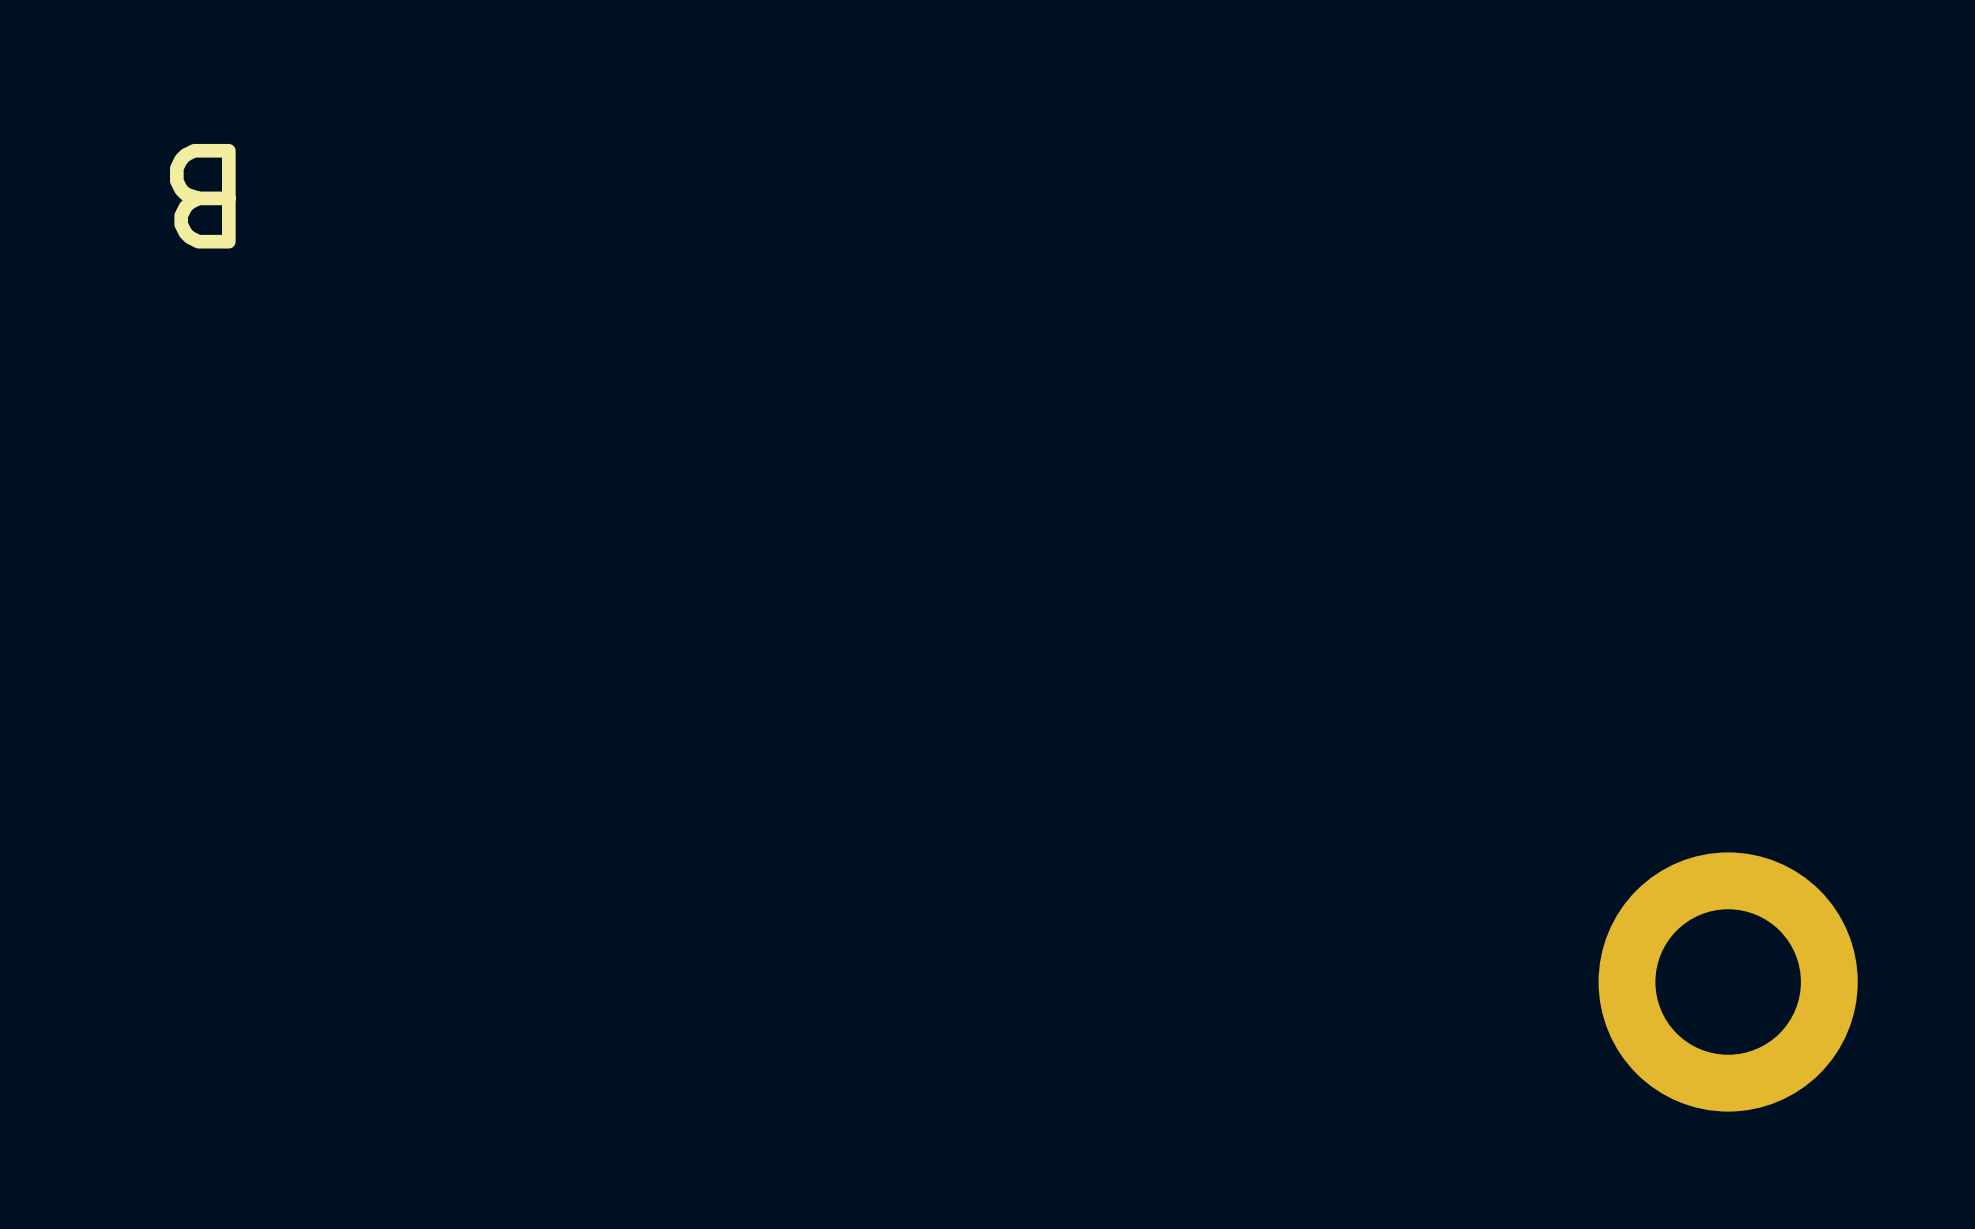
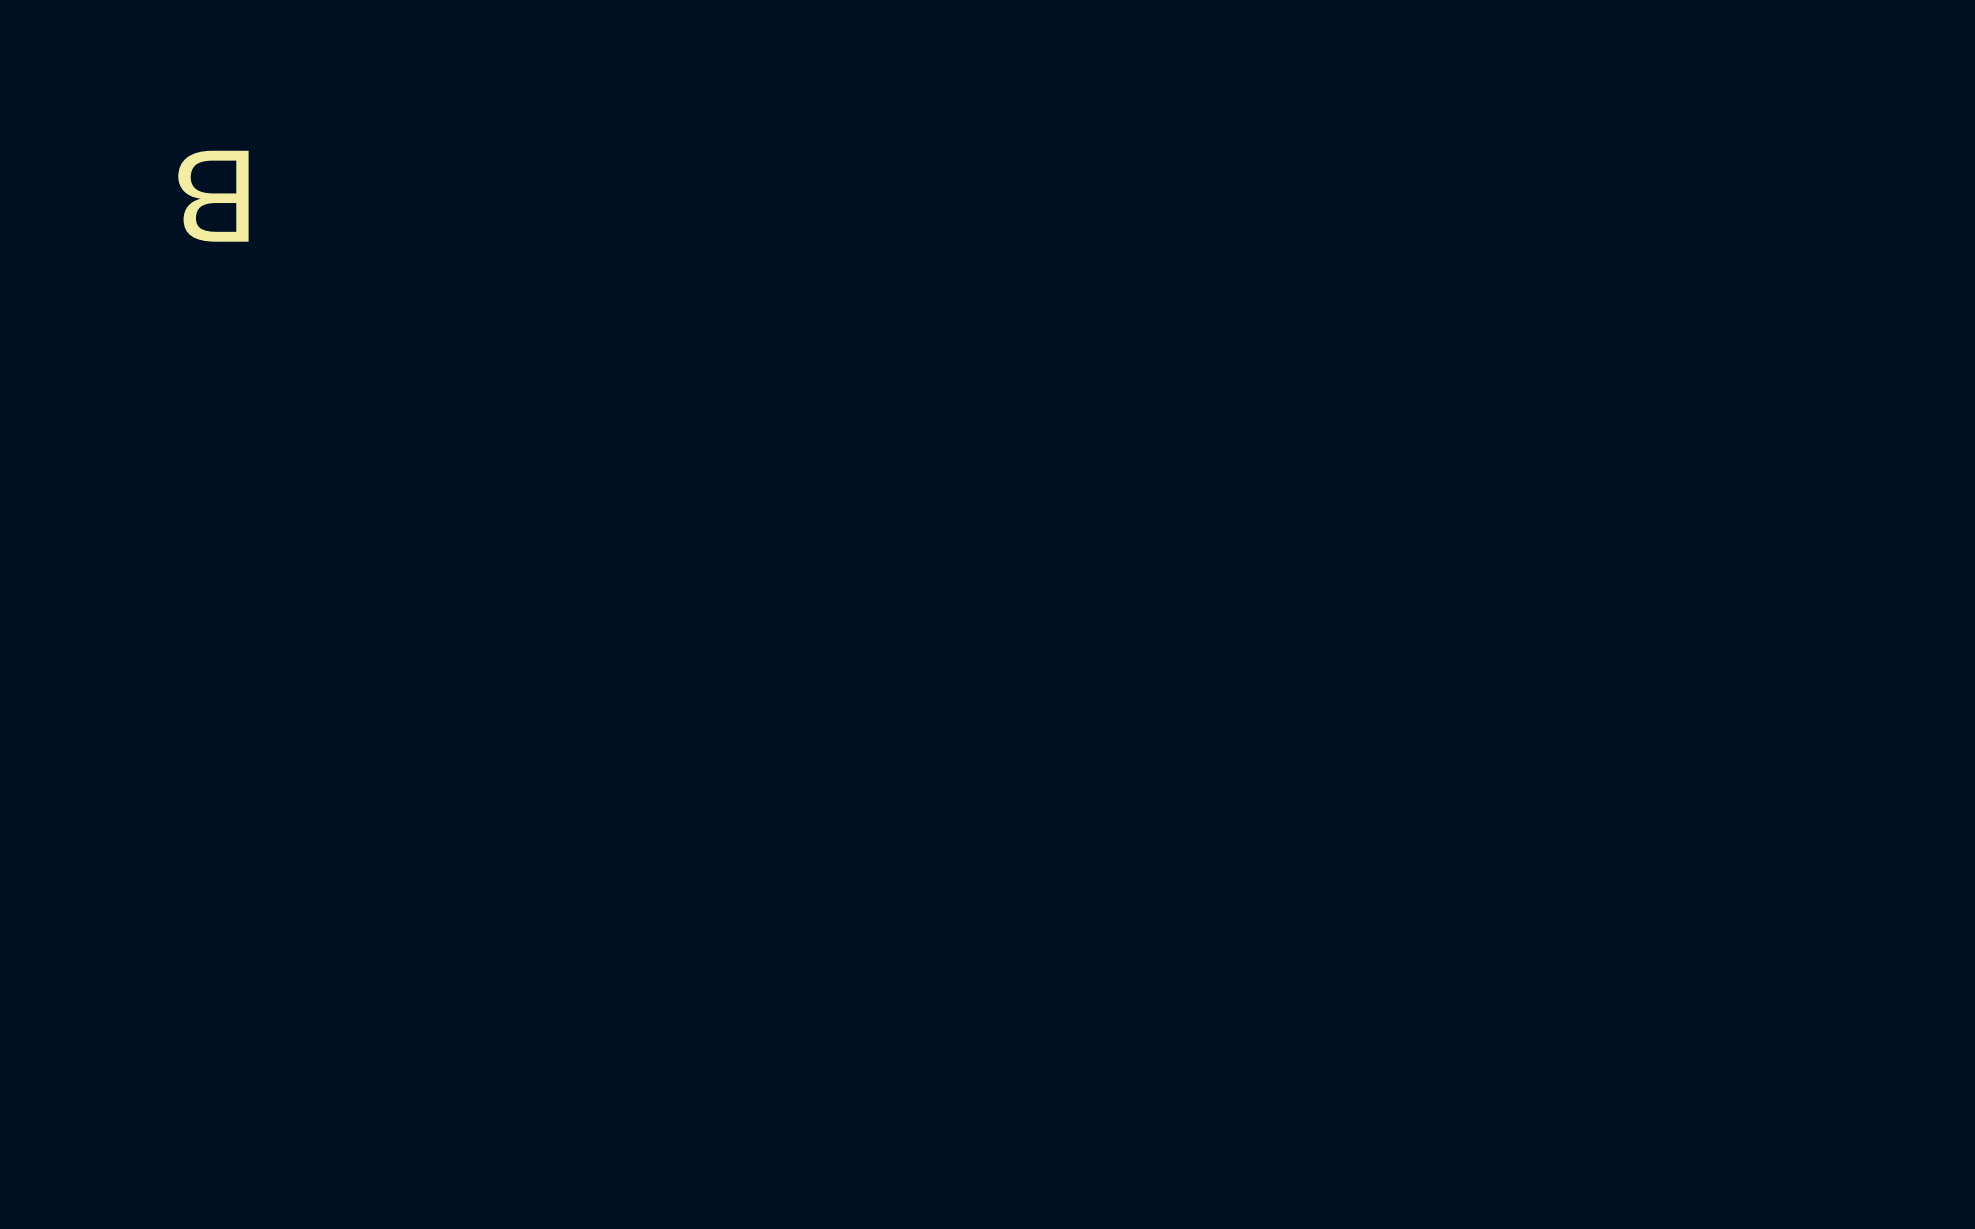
part: (1728, 982) -> none

